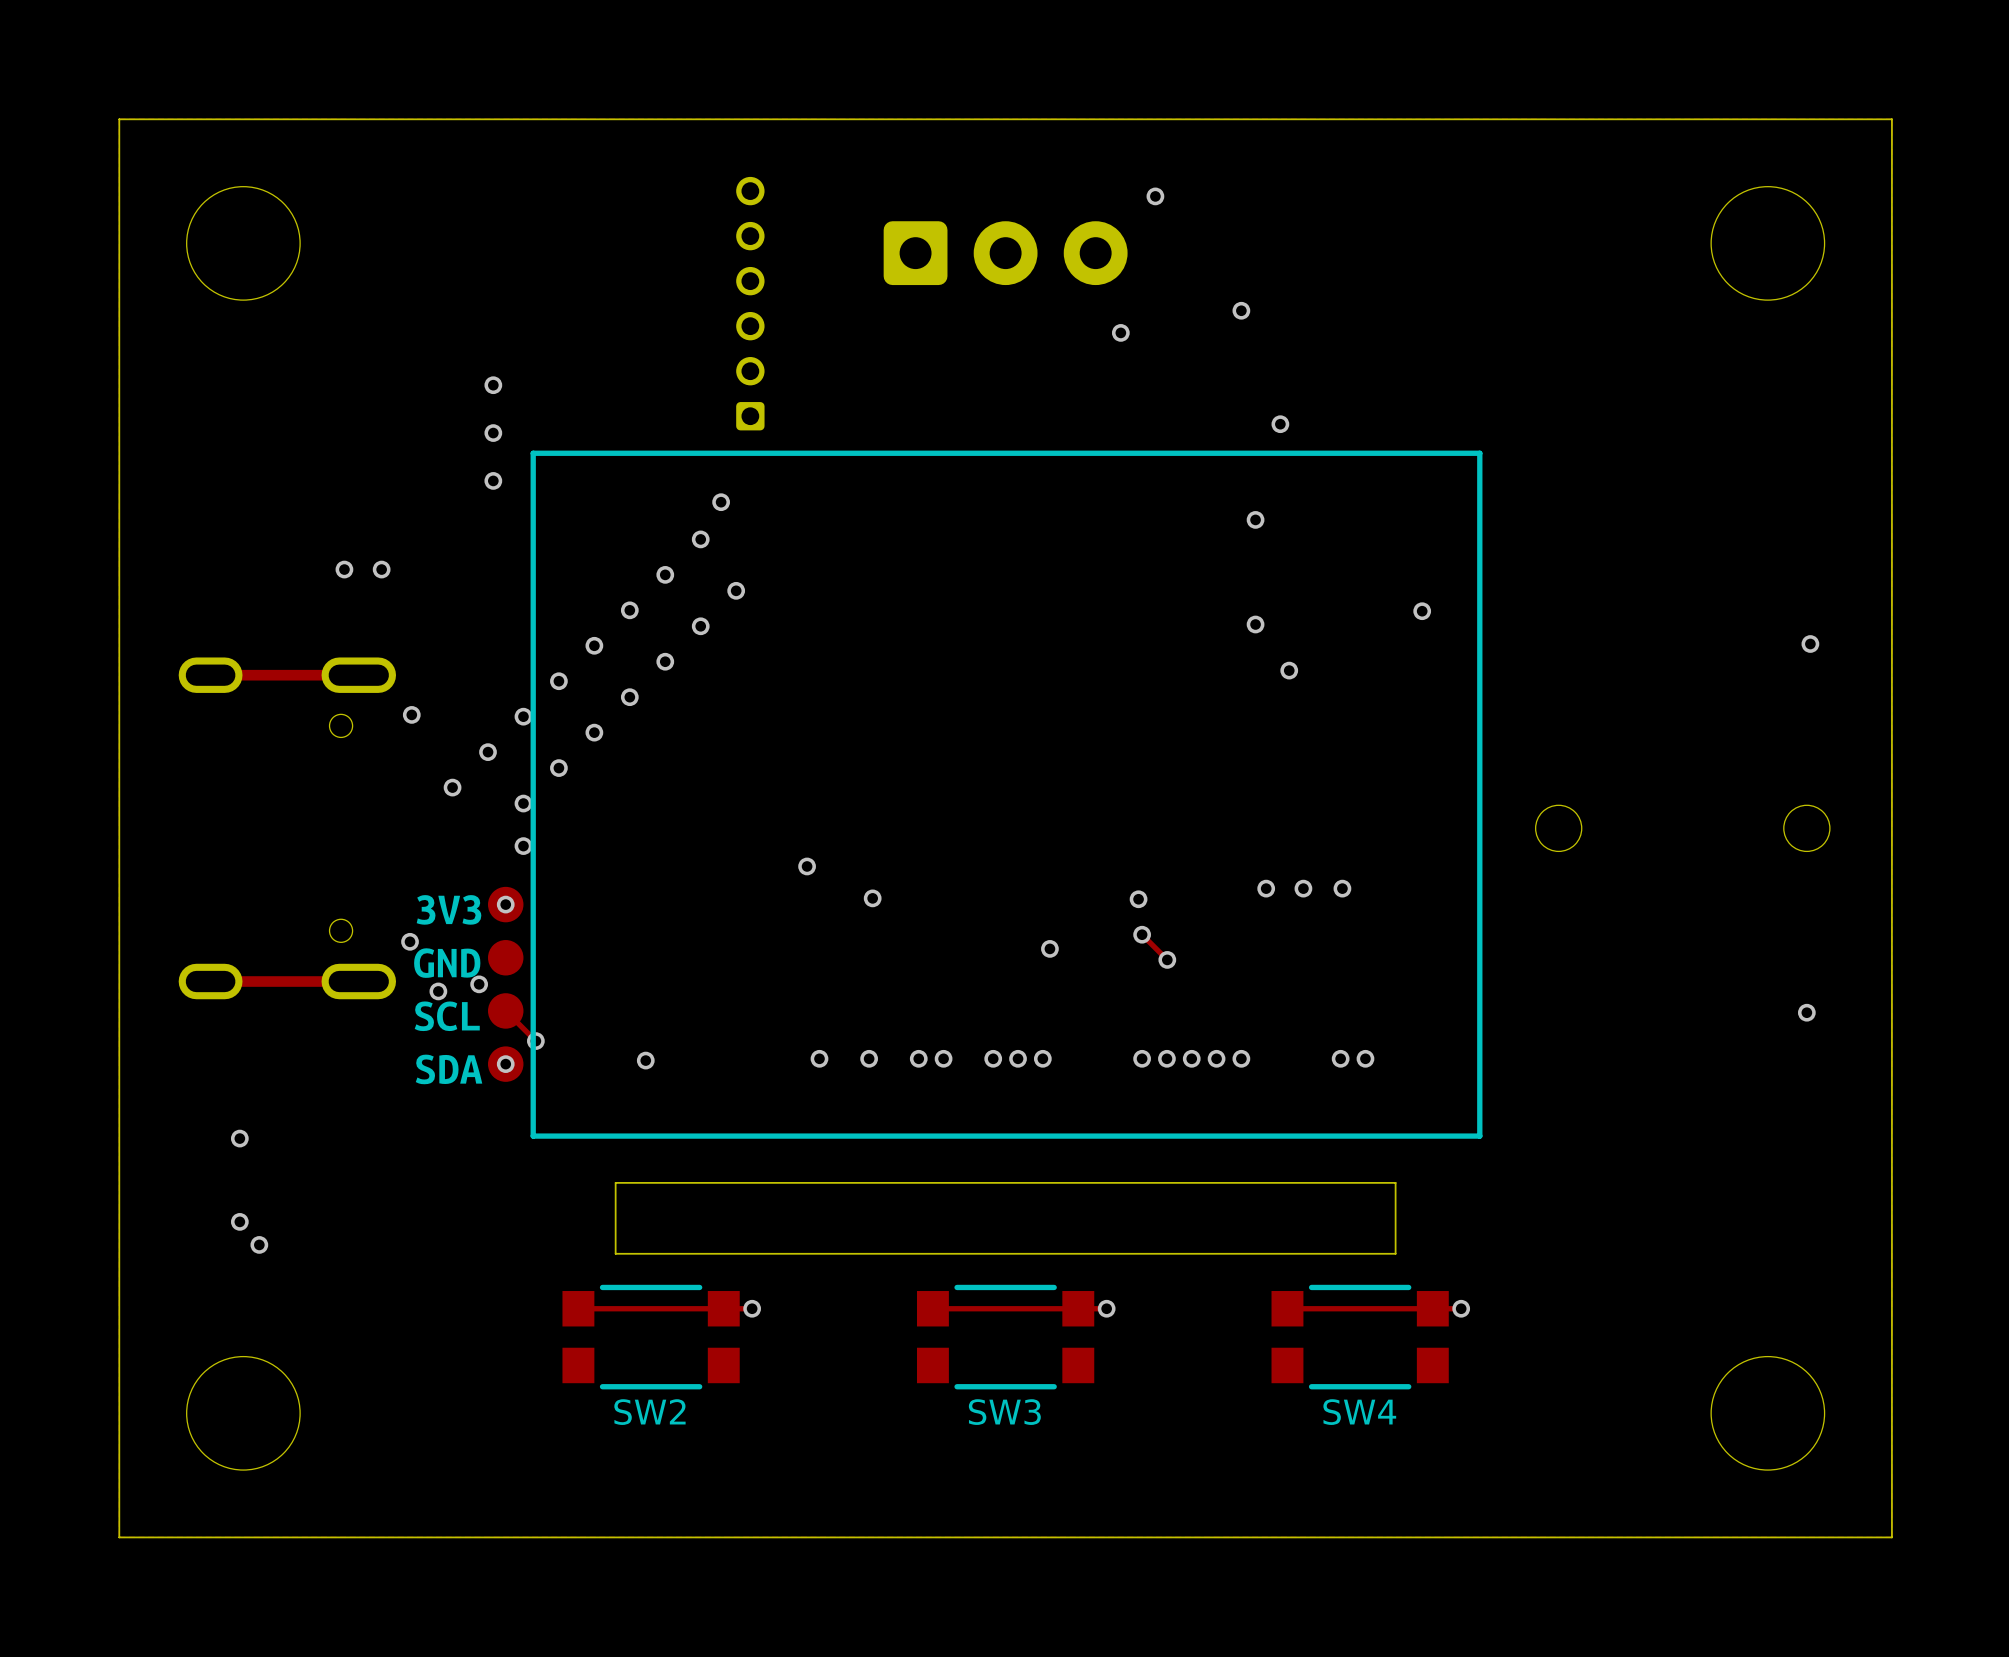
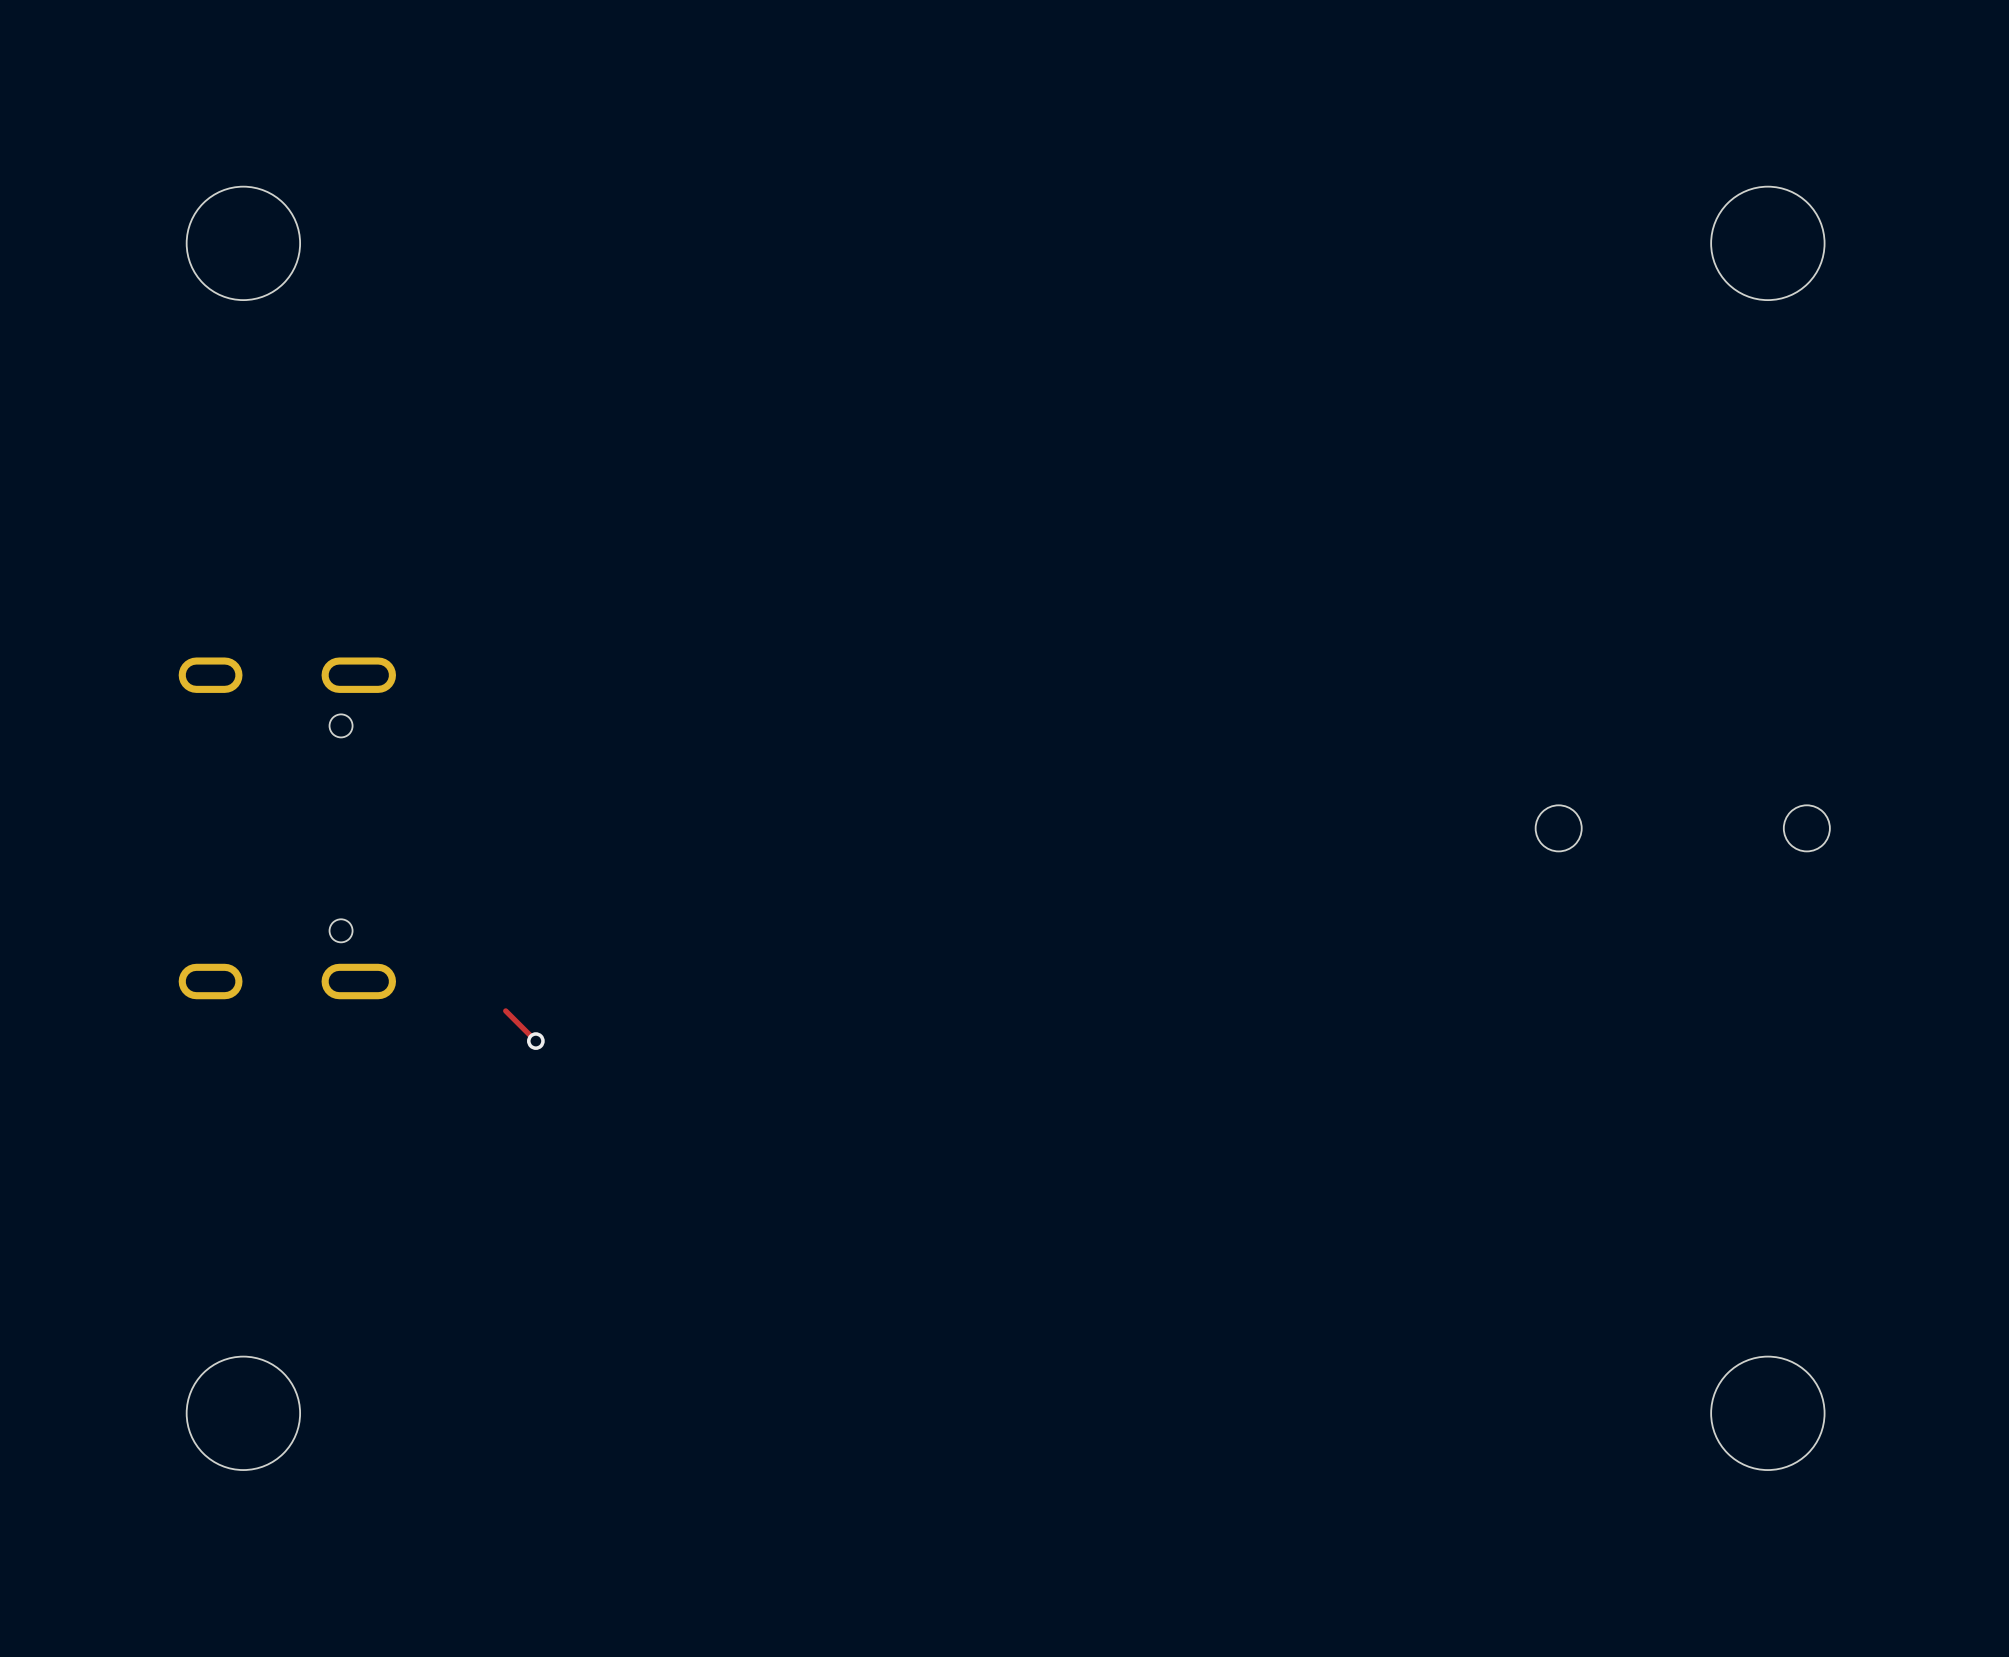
board edge: (119, 119) (1891, 119) (1891, 1537) (119, 1537) (119, 119) -> none
via: (1155, 196) -> none
part: (1005, 253) -> none
part: (750, 303) -> none
via: (1241, 310) -> none
via: (1120, 332) -> none
via: (493, 385) -> none
via: (1280, 424) -> none
via: (493, 433) -> none
line: (533, 453) (1479, 453) (1479, 1136) (533, 1136) (533, 453) -> none
via: (493, 480) -> none
via: (721, 502) -> none
via: (1255, 519) -> none
via: (700, 539) -> none
via: (344, 569) -> none
via: (381, 569) -> none
via: (665, 574) -> none
via: (736, 590) -> none
via: (629, 610) -> none
via: (1422, 611) -> none
via: (1255, 624) -> none
via: (700, 626) -> none
via: (1810, 644) -> none
via: (594, 645) -> none
via: (665, 661) -> none
via: (1289, 670) -> none
track: (210, 675) (358, 675) -> none
via: (558, 681) -> none
via: (629, 697) -> none
via: (411, 714) -> none
via: (523, 716) -> none
via: (594, 732) -> none
via: (488, 752) -> none
via: (558, 768) -> none
via: (452, 787) -> none
via: (523, 803) -> none
via: (523, 846) -> none
via: (807, 866) -> none
via: (1266, 888) -> none
via: (1303, 888) -> none
via: (1342, 888) -> none
drawing: [414, 895, 483, 1085] -> none
via: (872, 898) -> none
via: (1138, 899) -> none
part: (505, 904) -> none
via: (505, 904) -> none
track: (1142, 934) (1167, 959) -> none
via: (1142, 934) -> none
via: (410, 941) -> none
via: (1049, 948) -> none
part: (505, 957) -> none
via: (1167, 959) -> none
track: (210, 981) (358, 981) -> none
via: (479, 984) -> none
via: (438, 991) -> none
part: (505, 1010) -> none
via: (1806, 1012) -> none
via: (819, 1058) -> none
via: (869, 1058) -> none
via: (918, 1058) -> none
via: (943, 1058) -> none
via: (993, 1058) -> none
via: (1018, 1058) -> none
via: (1042, 1058) -> none
via: (1142, 1058) -> none
via: (1166, 1058) -> none
via: (1191, 1058) -> none
via: (1216, 1058) -> none
via: (1241, 1058) -> none
via: (1340, 1058) -> none
via: (1365, 1058) -> none
via: (645, 1060) -> none
part: (505, 1064) -> none
via: (505, 1064) -> none
via: (239, 1138) -> none
board edge: (615, 1182) (1395, 1182) (1395, 1253) (615, 1253) (615, 1182) -> none
via: (239, 1221) -> none
via: (259, 1244) -> none
track: (578, 1308) (752, 1308) -> none
via: (752, 1308) -> none
track: (932, 1308) (1106, 1308) -> none
via: (1106, 1308) -> none
track: (1287, 1308) (1461, 1308) -> none
via: (1461, 1308) -> none
SW2: (651, 1337) -> none
SW3: (1005, 1337) -> none
SW4: (1360, 1337) -> none

